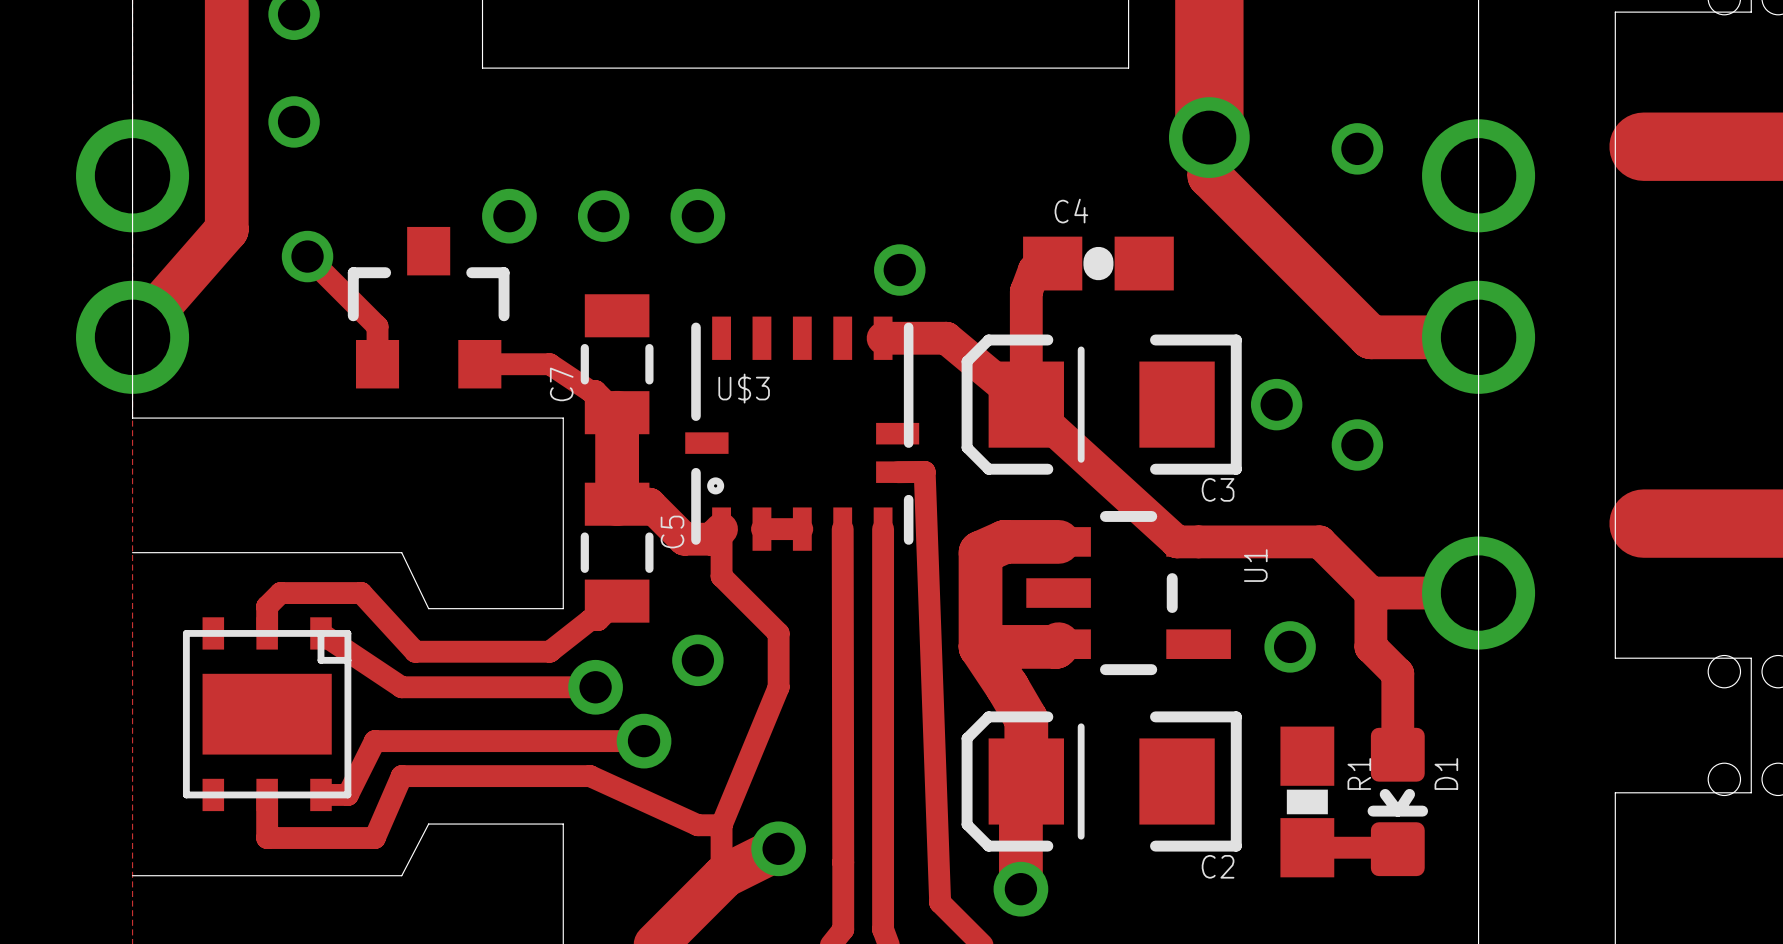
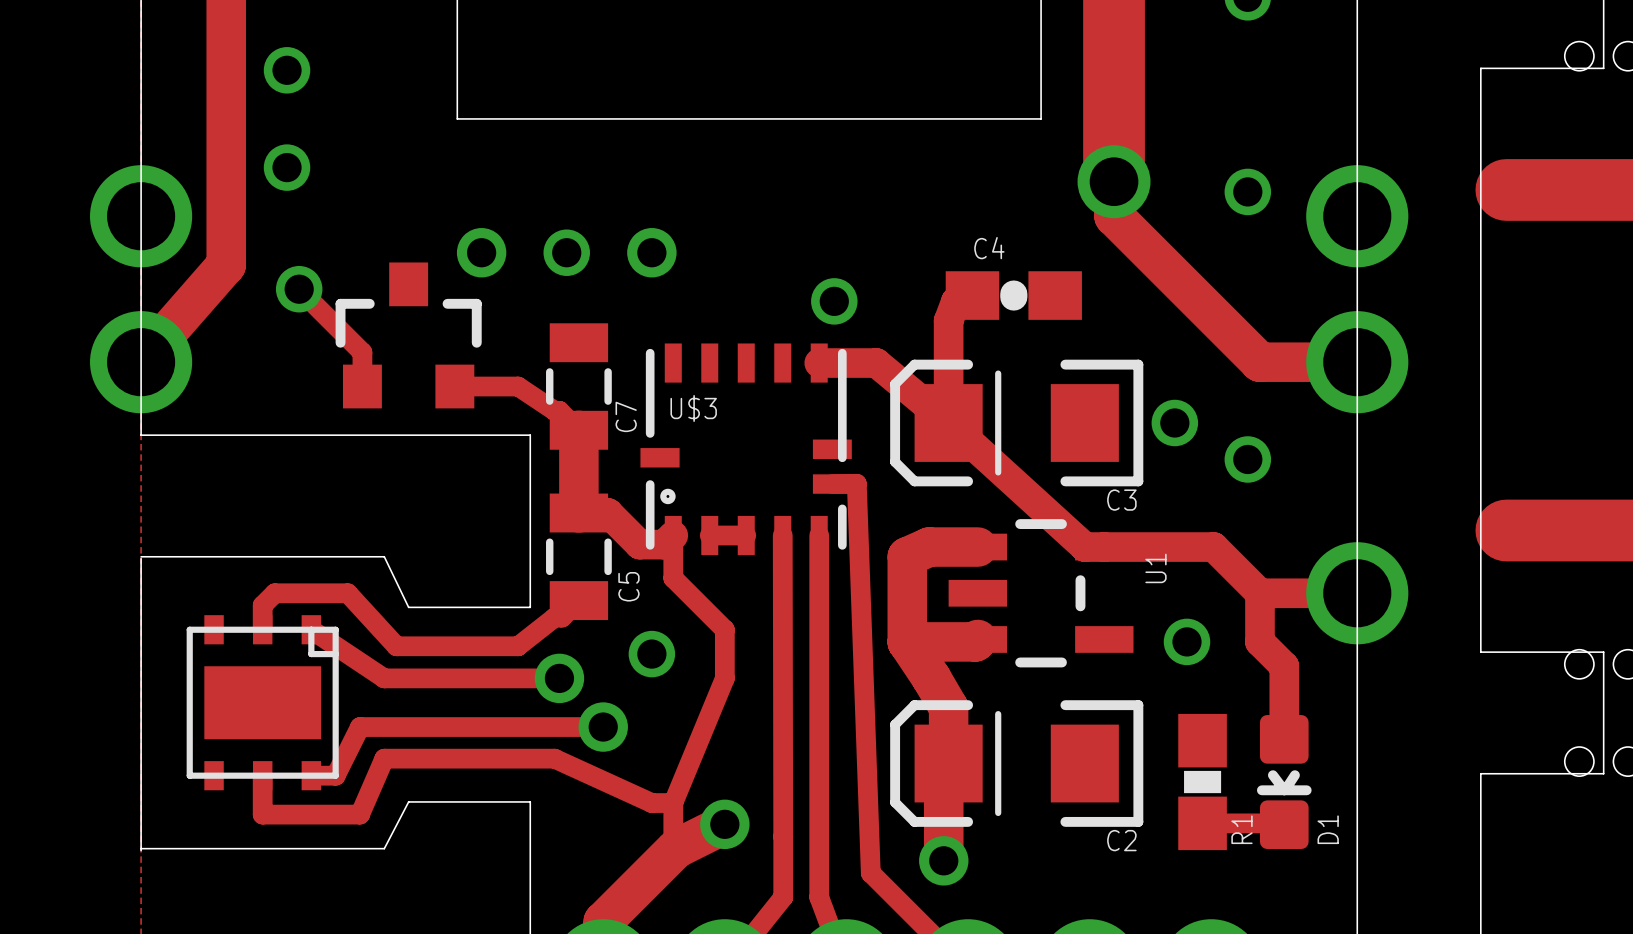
C7 name position: C7 (561, 384) -> C7 (626, 416)
C5 name position: C5 (672, 532) -> C5 (628, 586)
board edge: none -> (141, 558) (141, 850)
R1 name position: R1 (1359, 773) -> R1 (1241, 829)
D1 name position: D1 (1446, 773) -> D1 (1328, 829)

